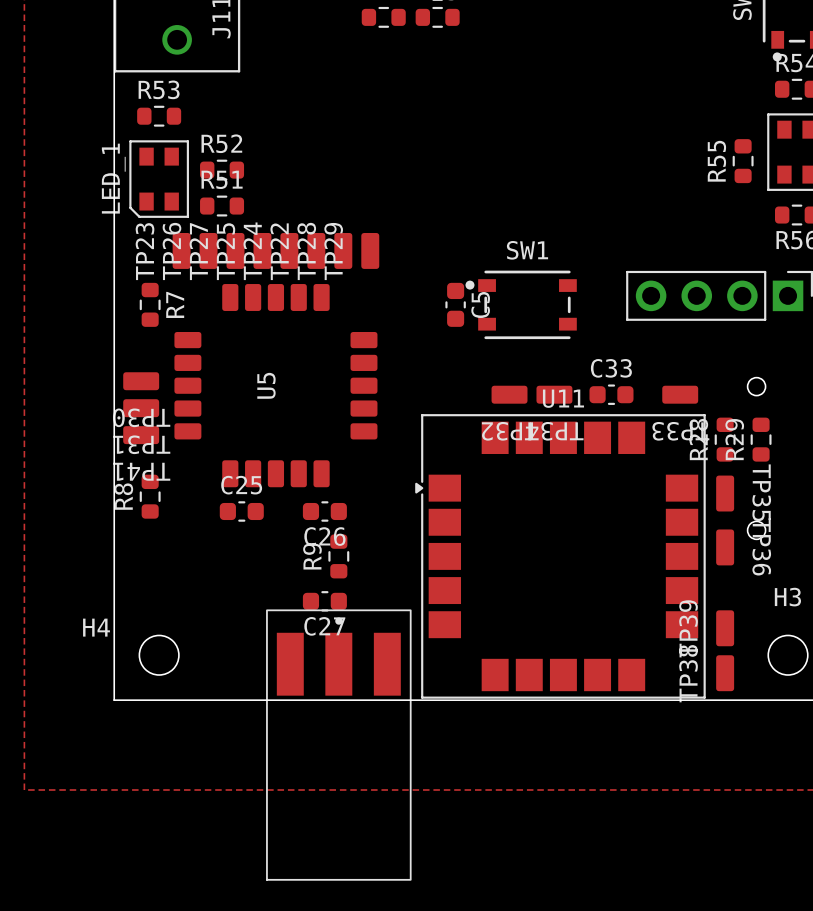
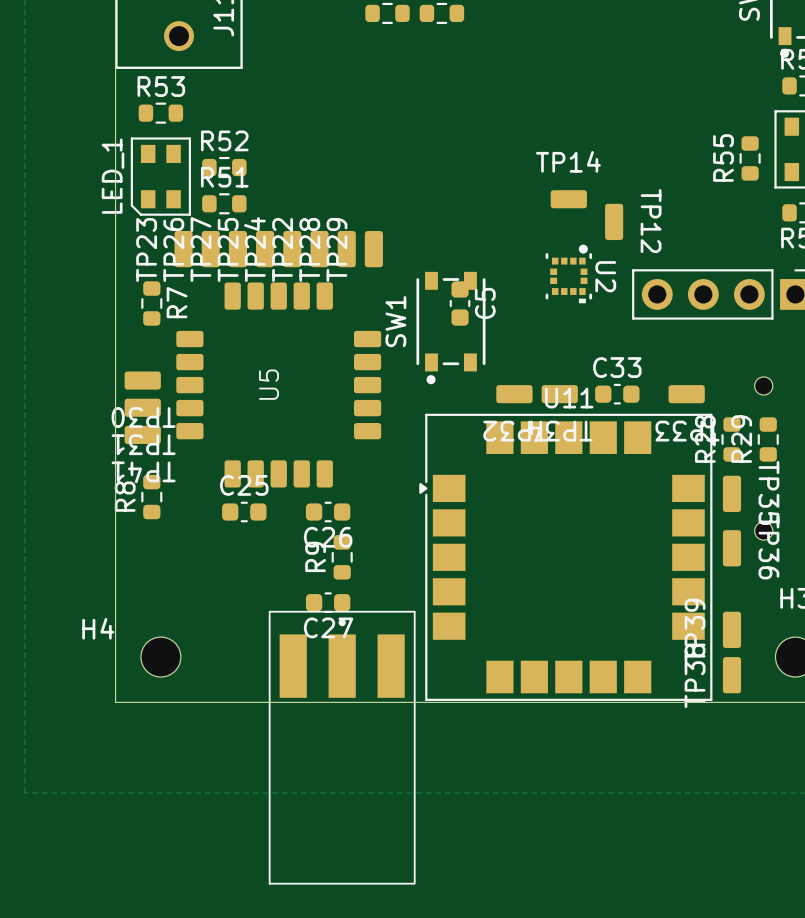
TP14: none -> (568, 199)
TP12: none -> (614, 221)
U2: none -> (568, 273)
SW1 rotation: 0° (521, 304) -> 90° counterclockwise (450, 328)
SW1 position: (521, 304) -> (450, 328)

